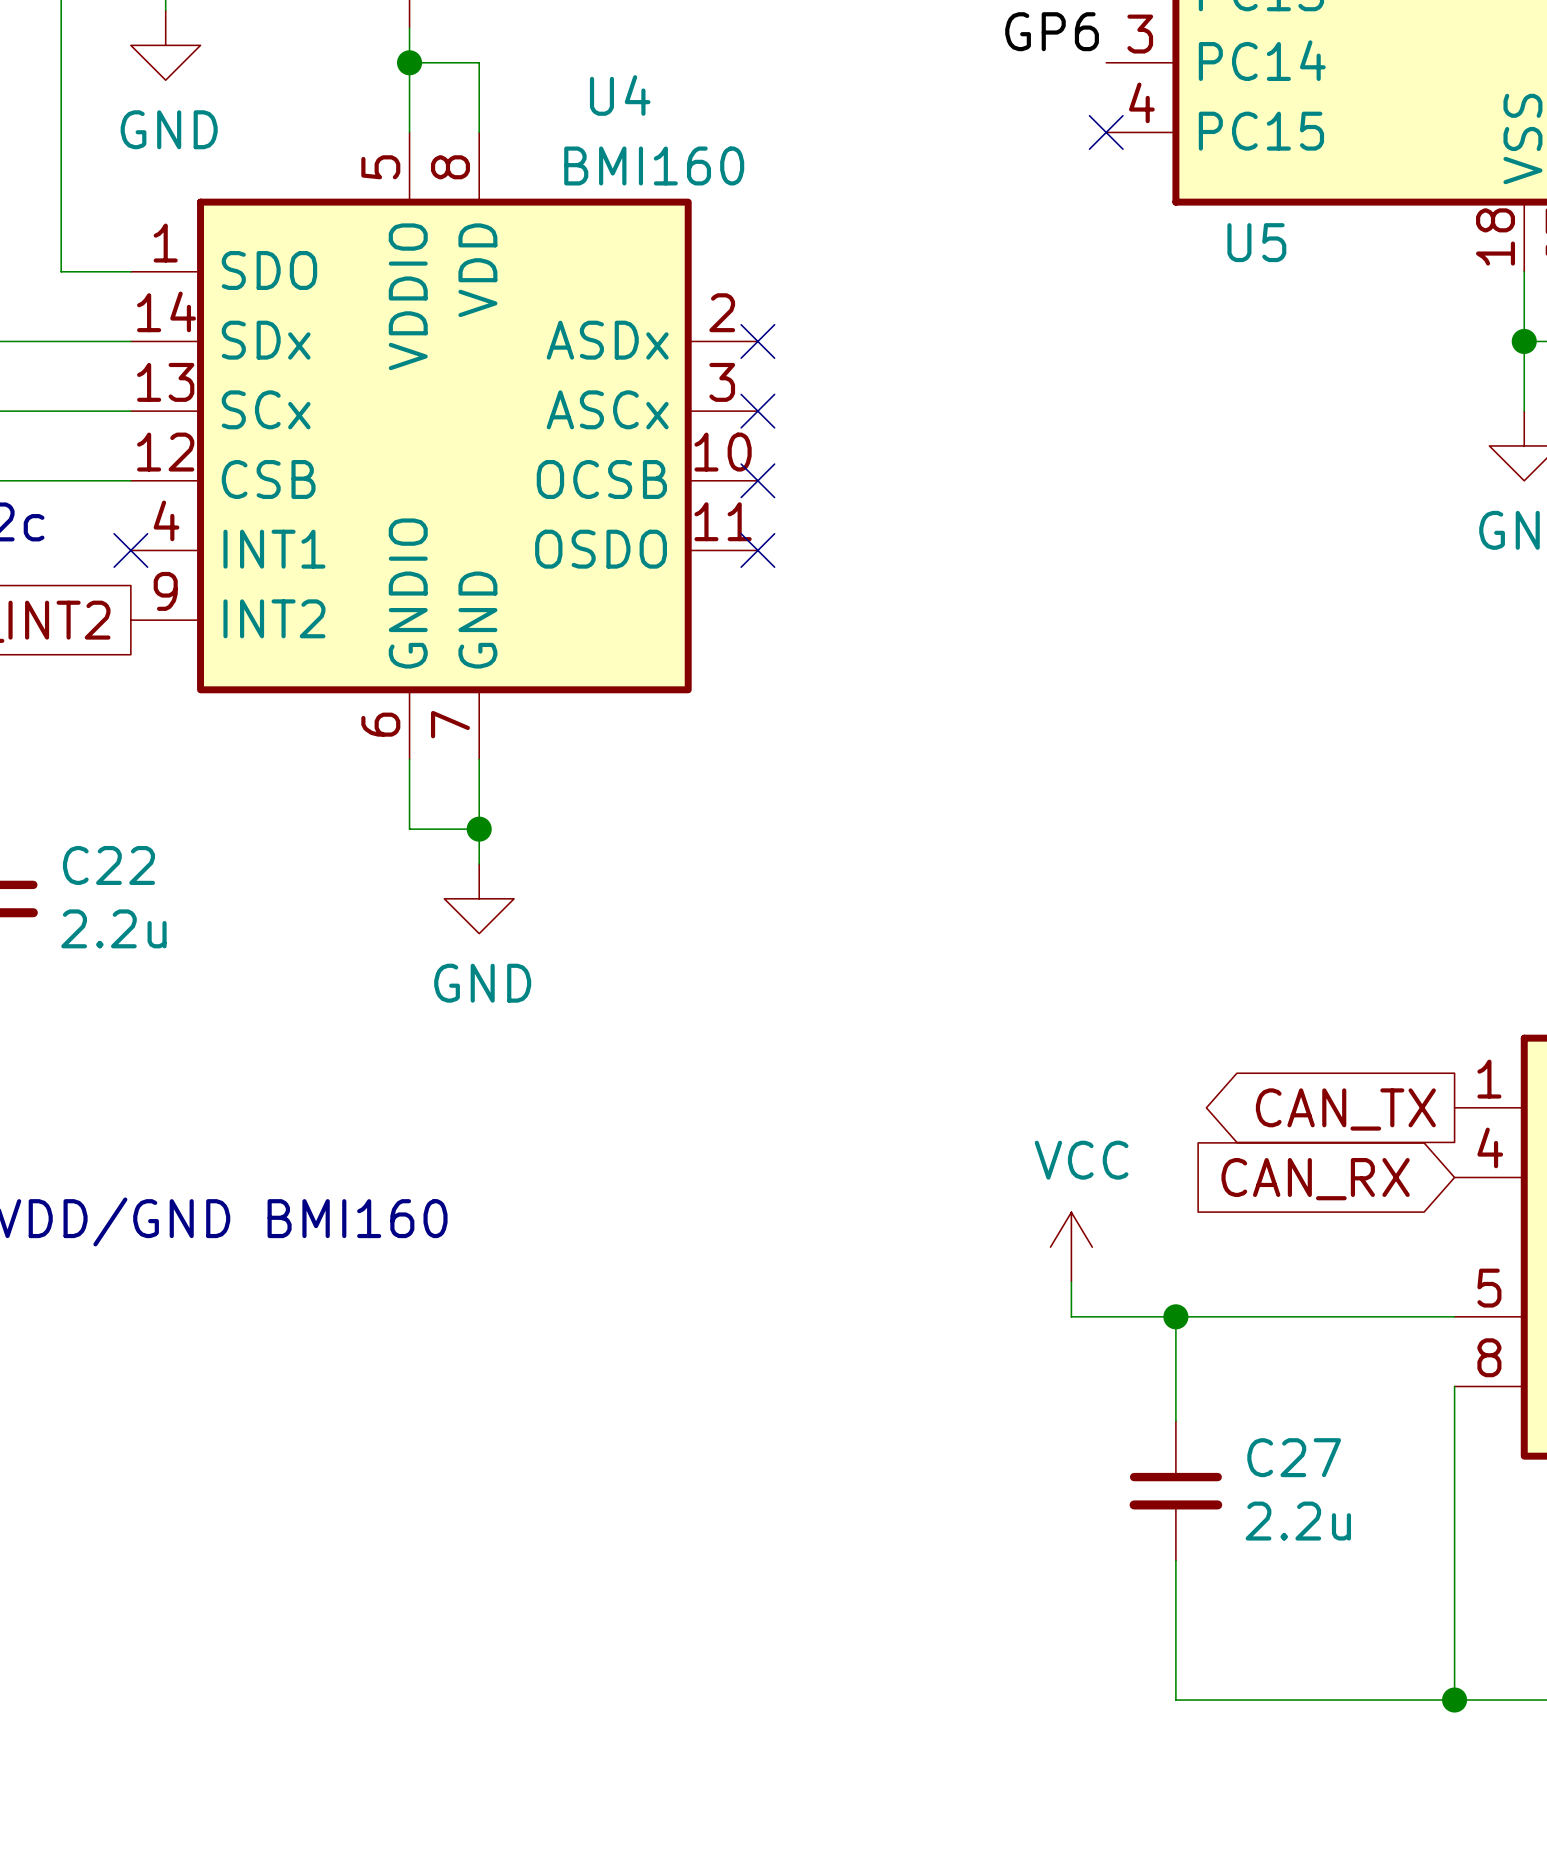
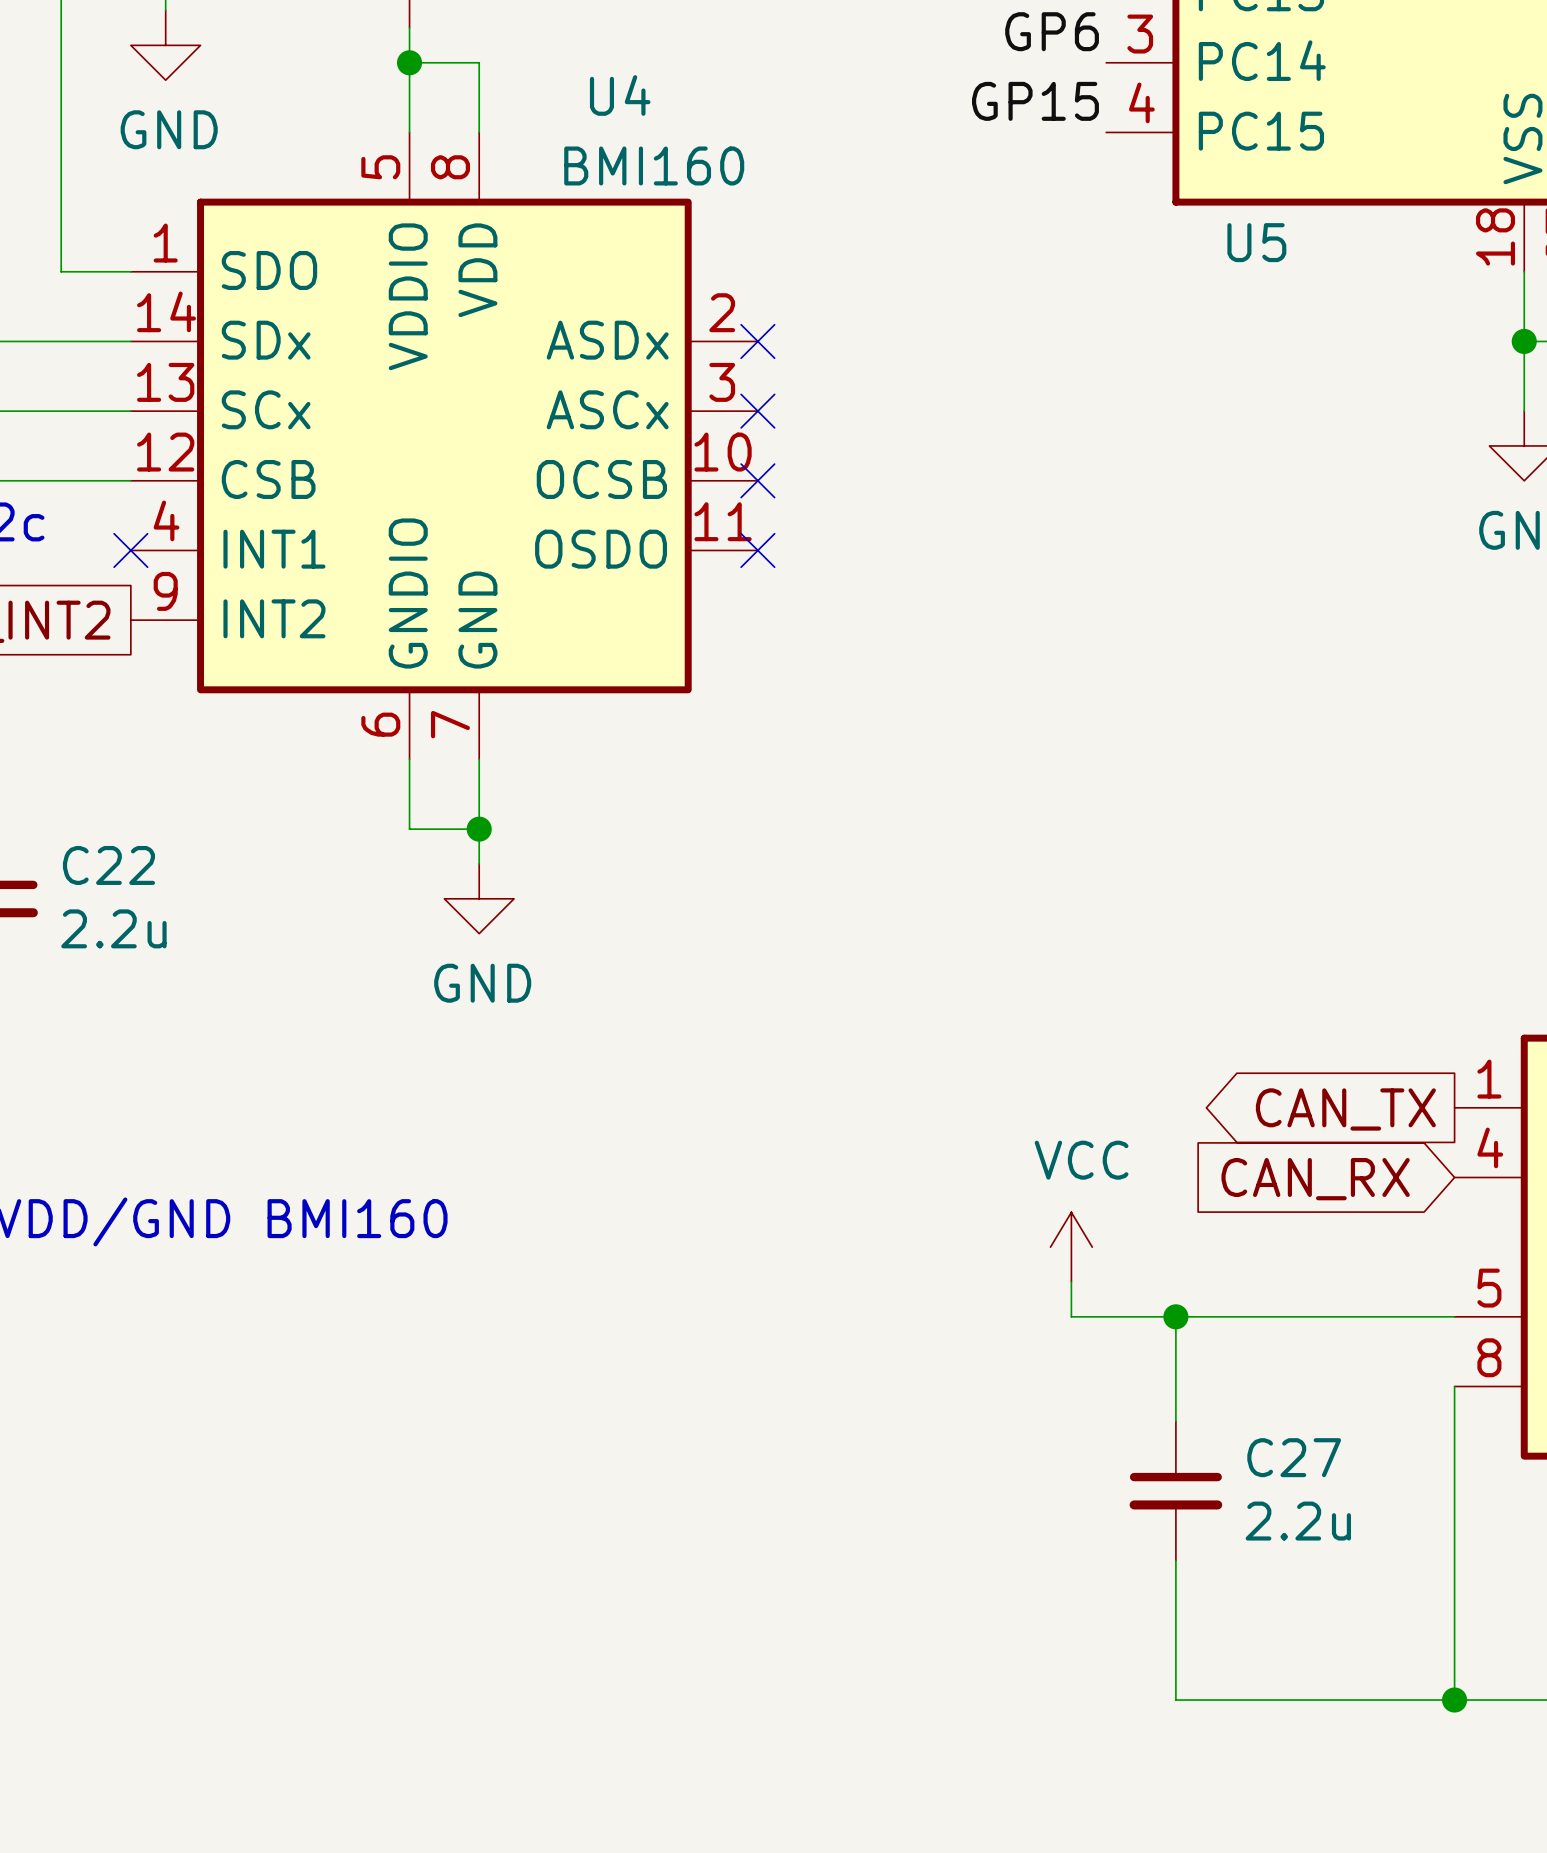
label: none -> GP15 (1035, 101)
no-connect mark: (1106, 132) -> none

